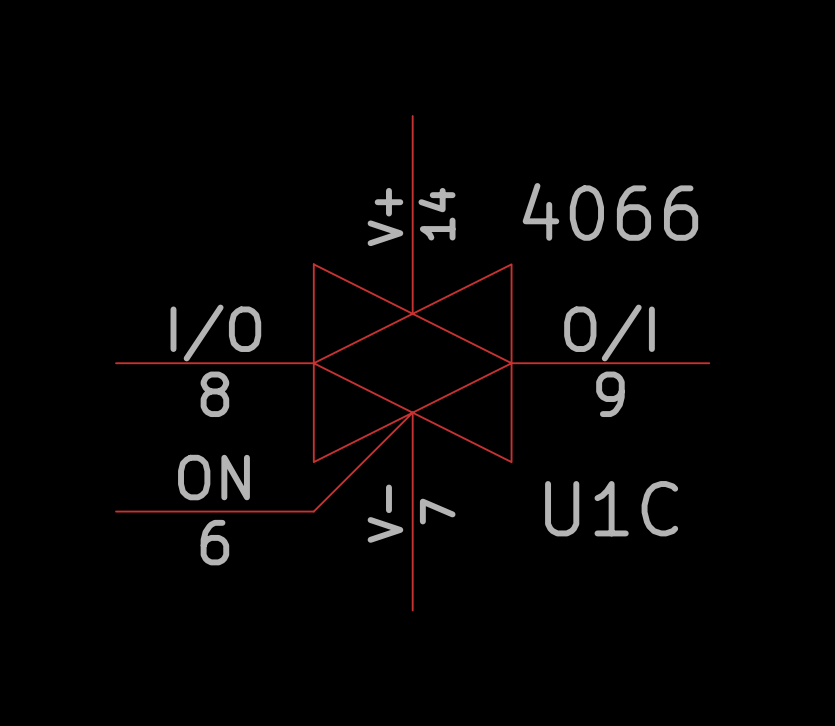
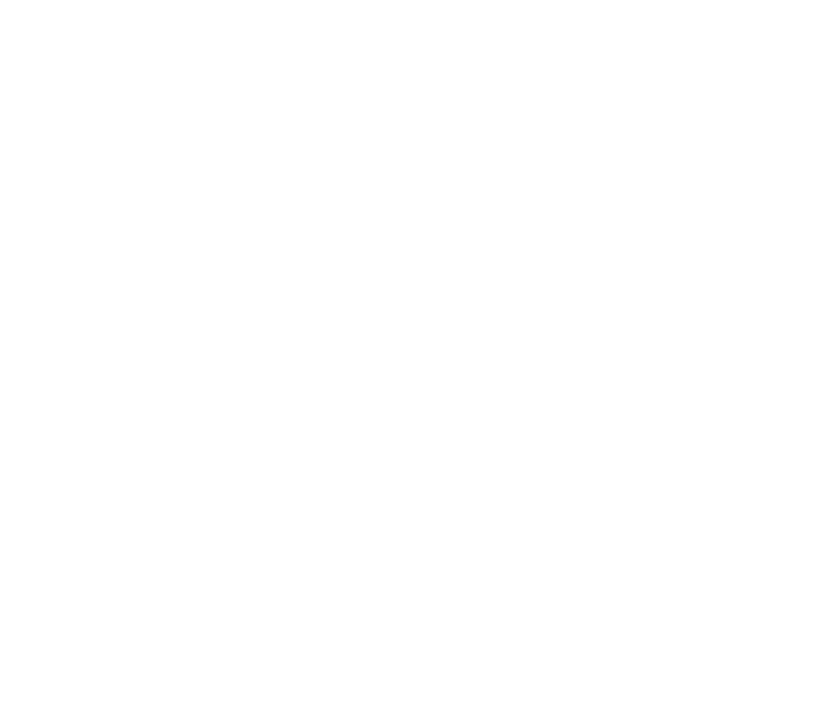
U1C: 4066 (412, 363) -> none

